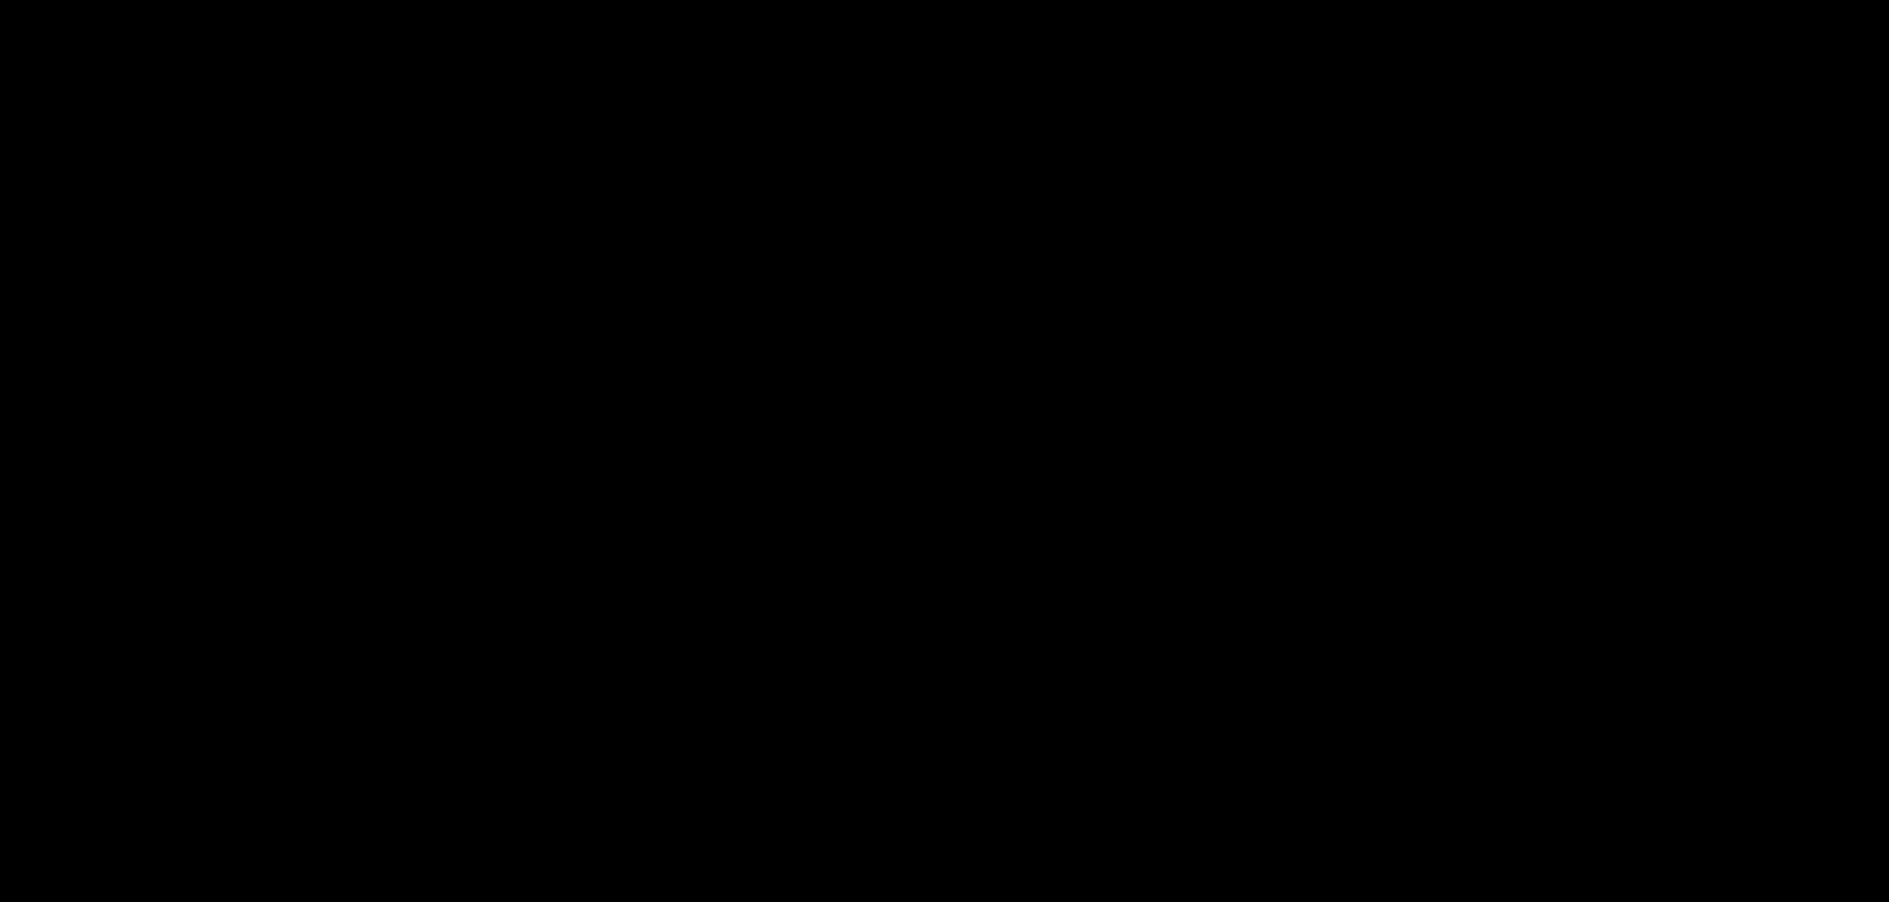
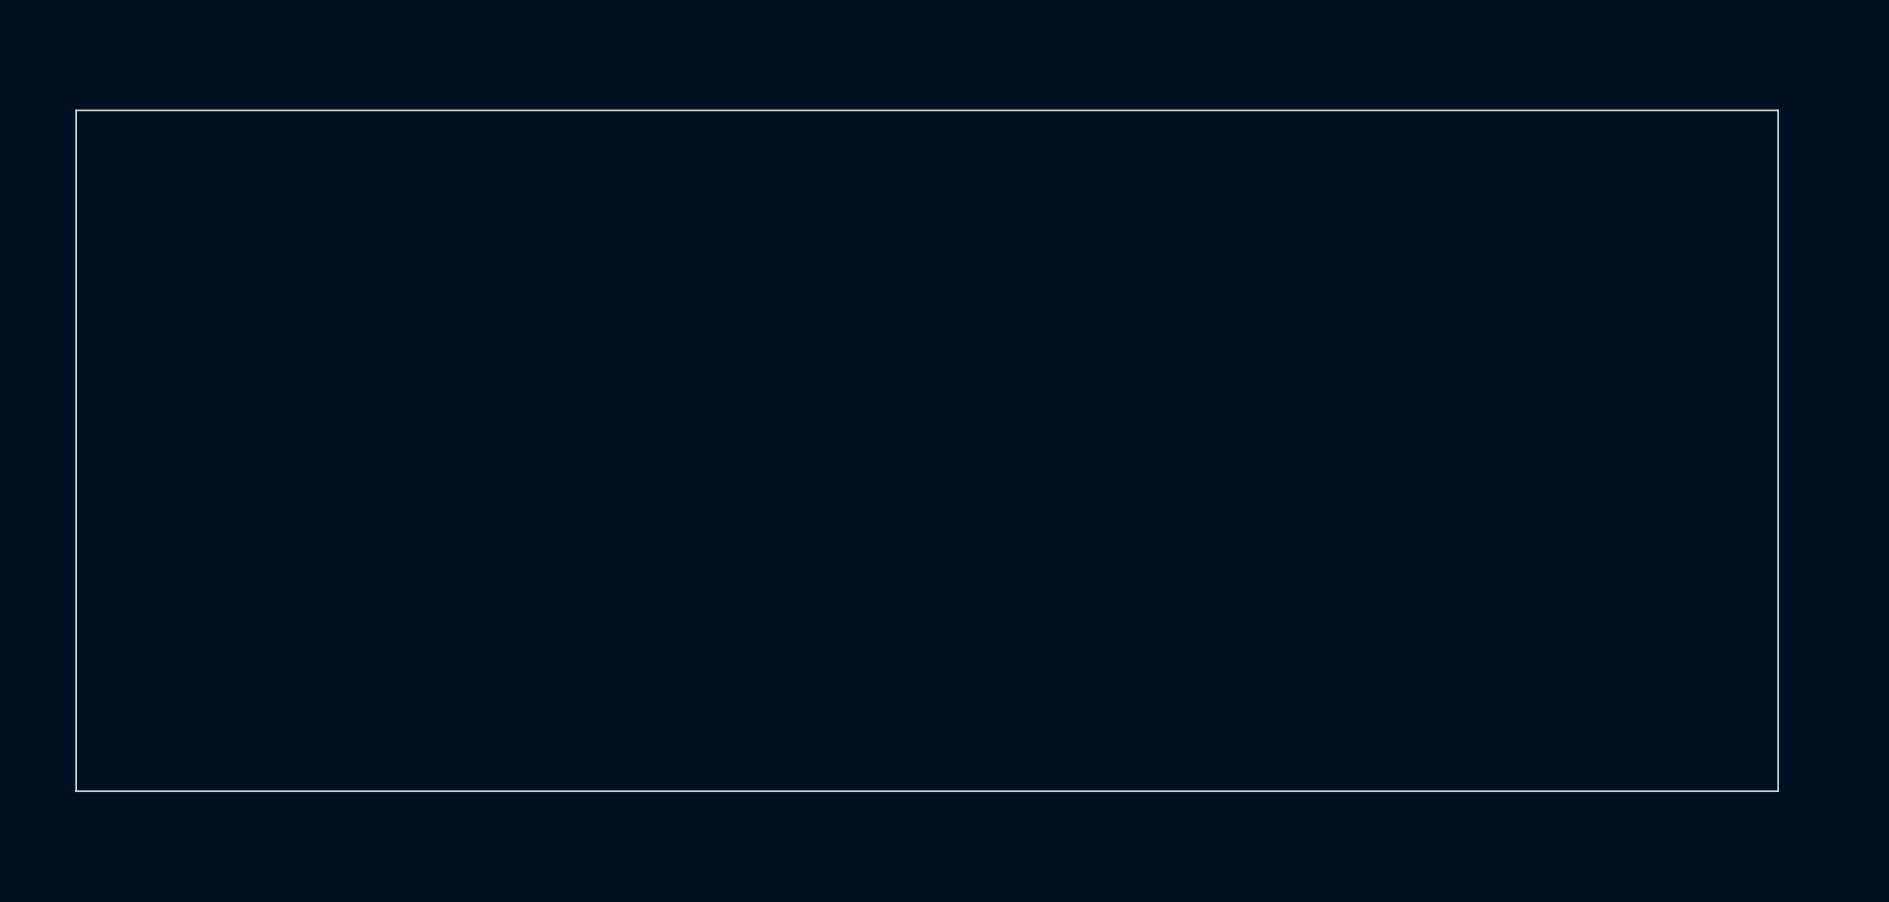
board edge: none -> (76, 110) (1778, 110) (1778, 791) (76, 791) (76, 110)

